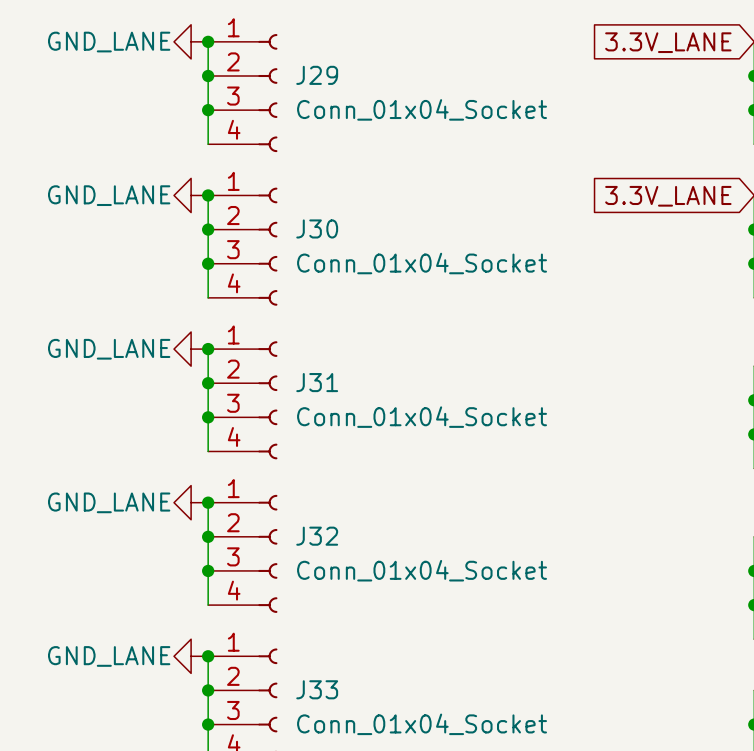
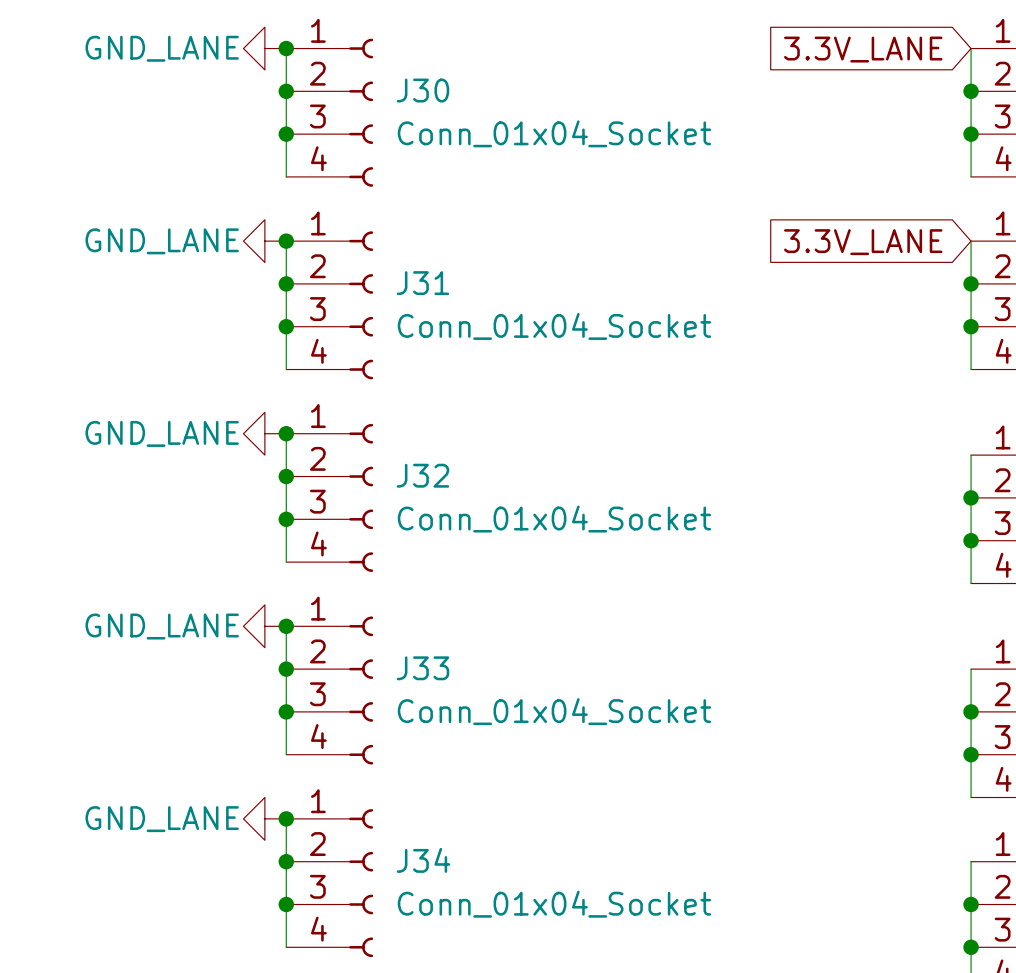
J29 name: J29 (317, 75) -> J30 (422, 90)
J30 name: J30 (317, 228) -> J31 (422, 283)
J31 name: J31 (317, 382) -> J32 (422, 475)
J32 name: J32 (317, 536) -> J33 (422, 668)
J33 name: J33 (317, 689) -> J34 (423, 860)

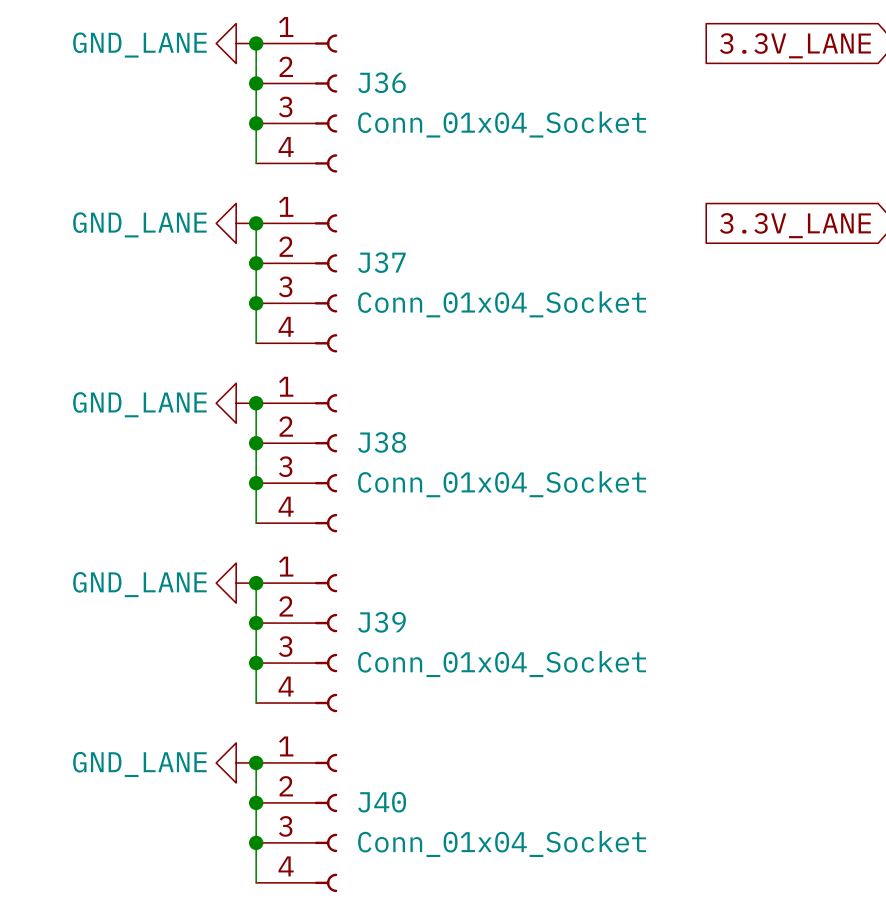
J30 name: J30 (422, 90) -> J36 (382, 82)
J31 name: J31 (422, 283) -> J37 (381, 262)
J32 name: J32 (422, 475) -> J38 (382, 442)
J33 name: J33 (422, 668) -> J39 (382, 622)
J34 name: J34 (423, 860) -> J40 (382, 802)

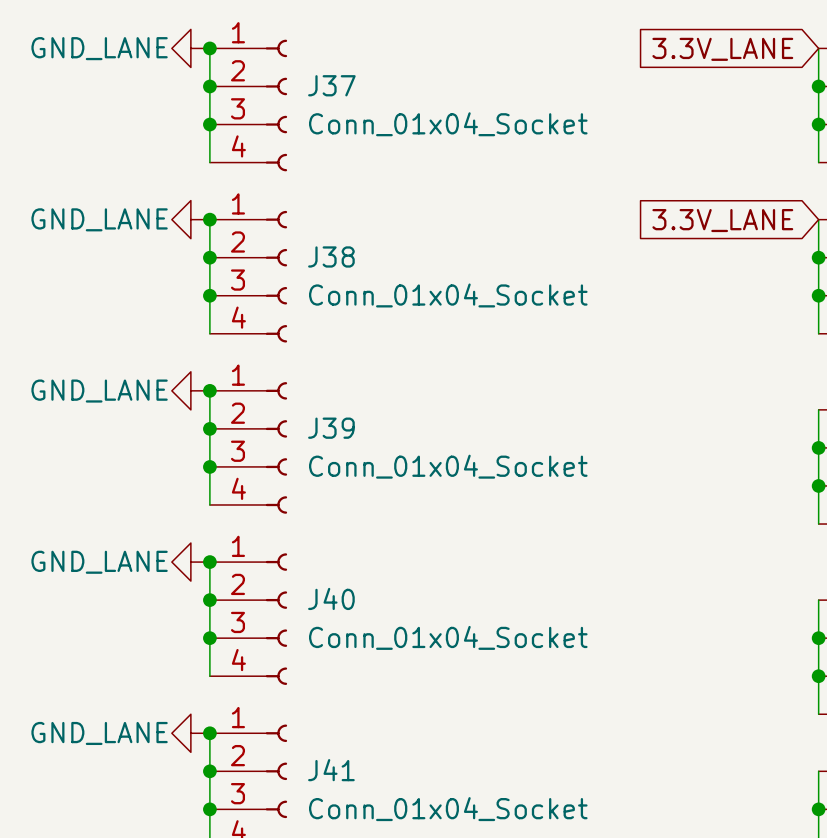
J36 name: J36 (382, 82) -> J37 (331, 85)
J37 name: J37 (381, 262) -> J38 (331, 256)
J38 name: J38 (382, 442) -> J39 (331, 428)
J39 name: J39 (382, 622) -> J40 (331, 598)
J40 name: J40 (382, 802) -> J41 (331, 770)

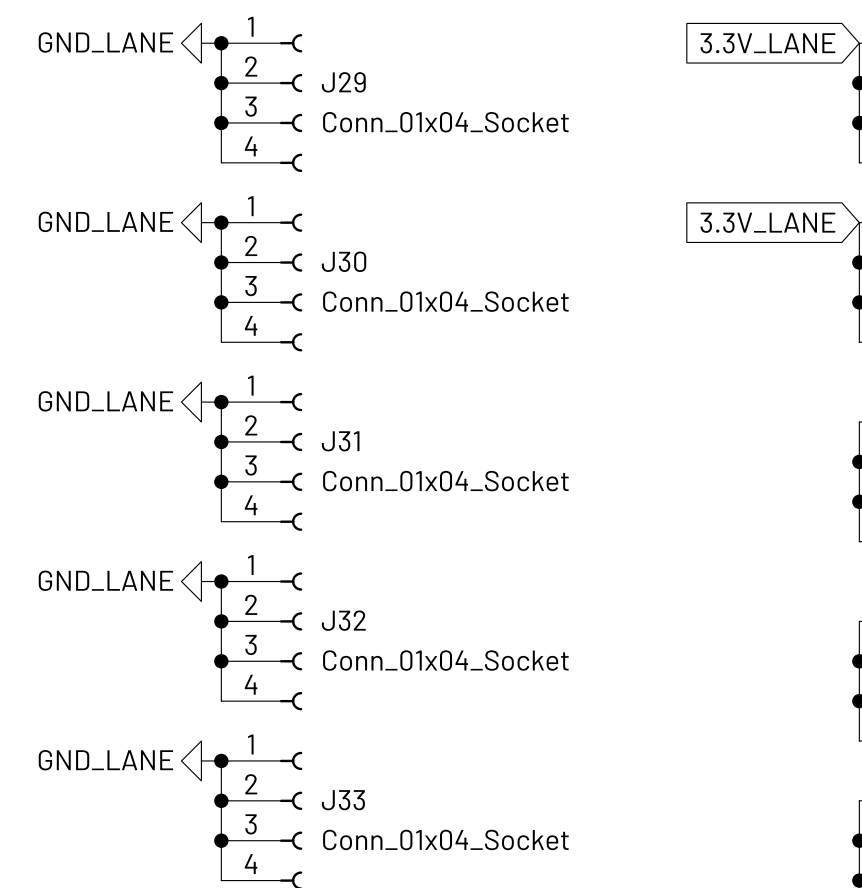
J37 name: J37 (331, 85) -> J29 (343, 82)
J38 name: J38 (331, 256) -> J30 (344, 261)
J39 name: J39 (331, 428) -> J31 (340, 441)
J40 name: J40 (331, 598) -> J32 (343, 620)
J41 name: J41 (331, 770) -> J33 (343, 800)

